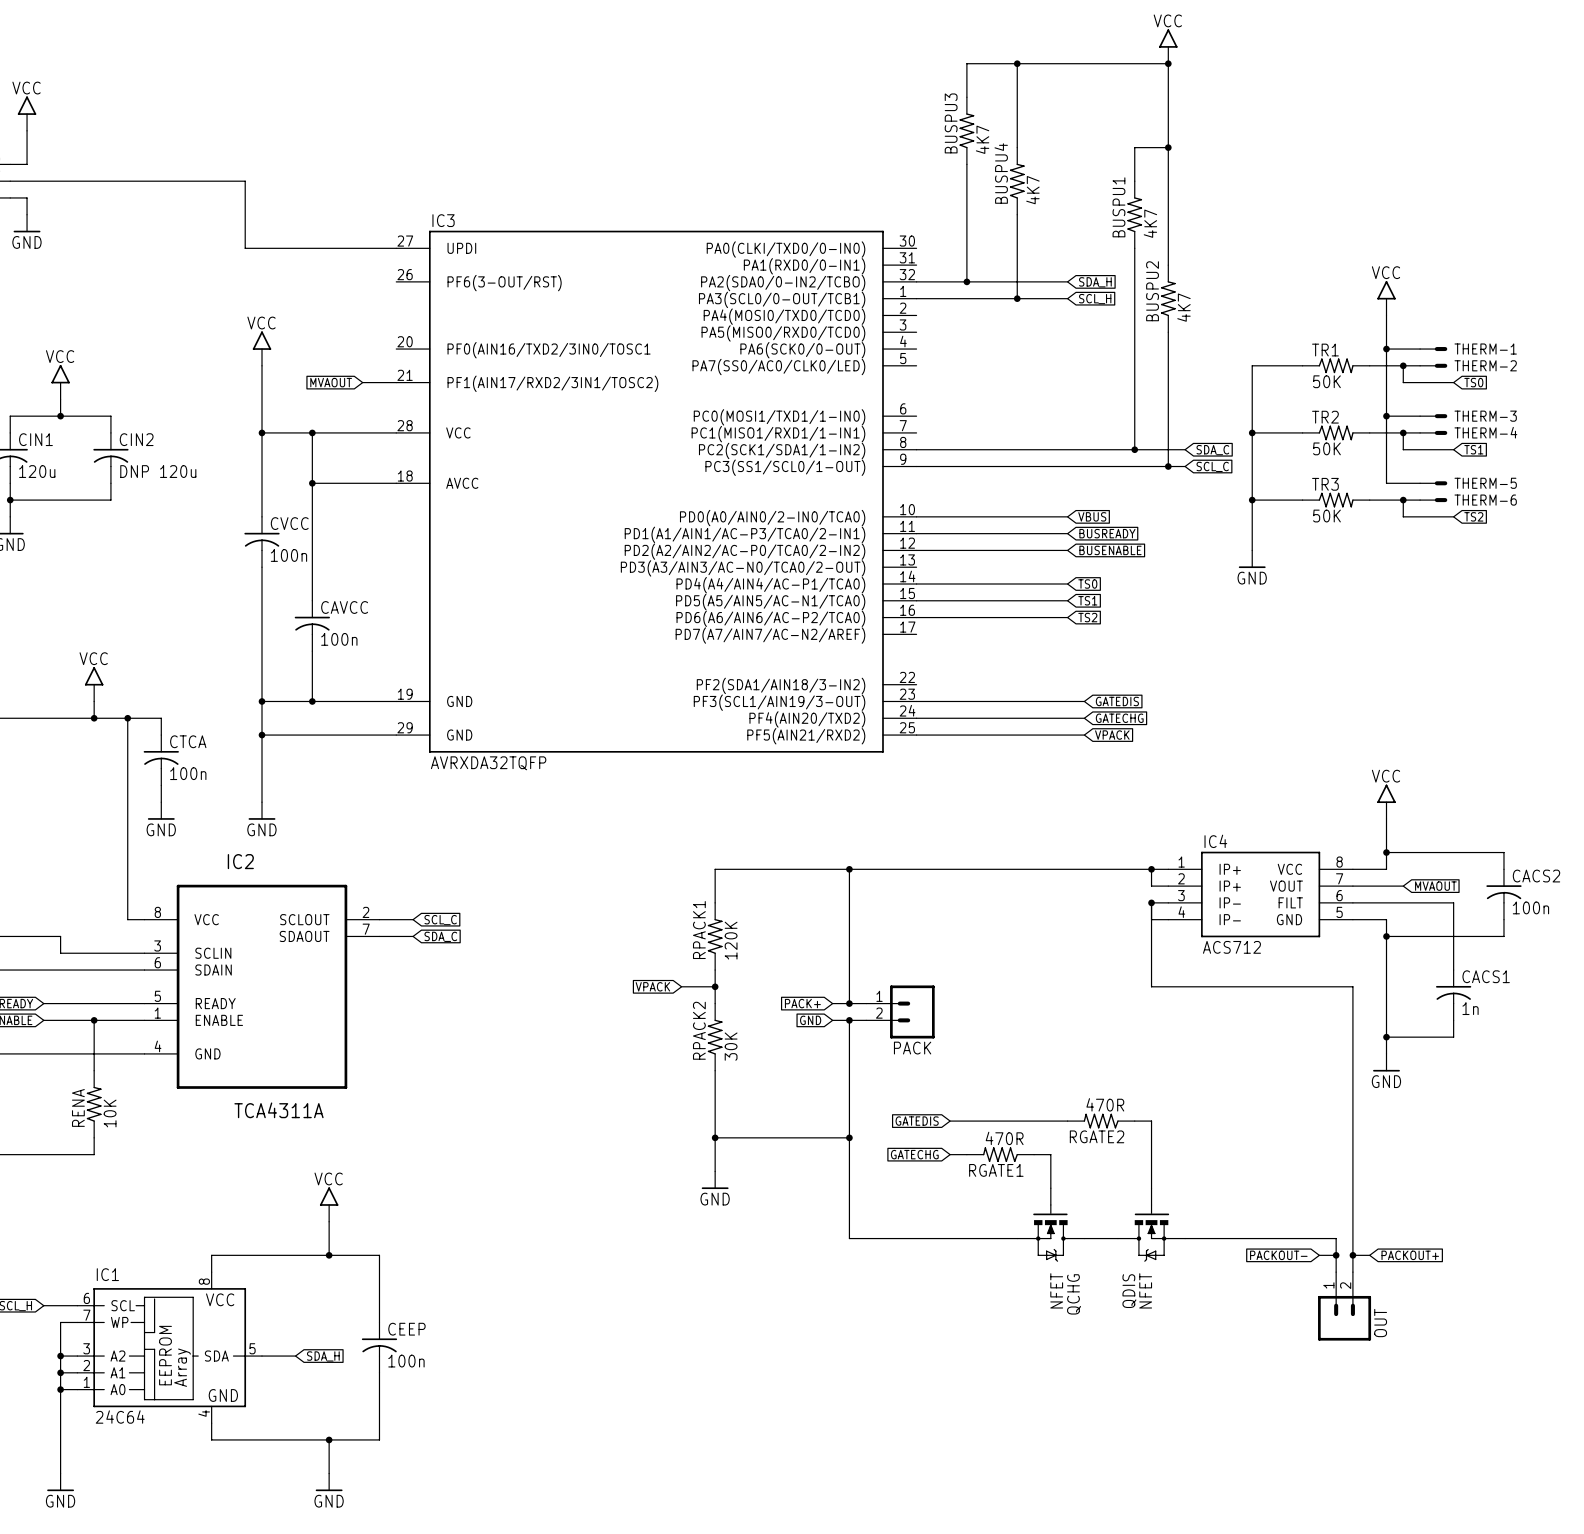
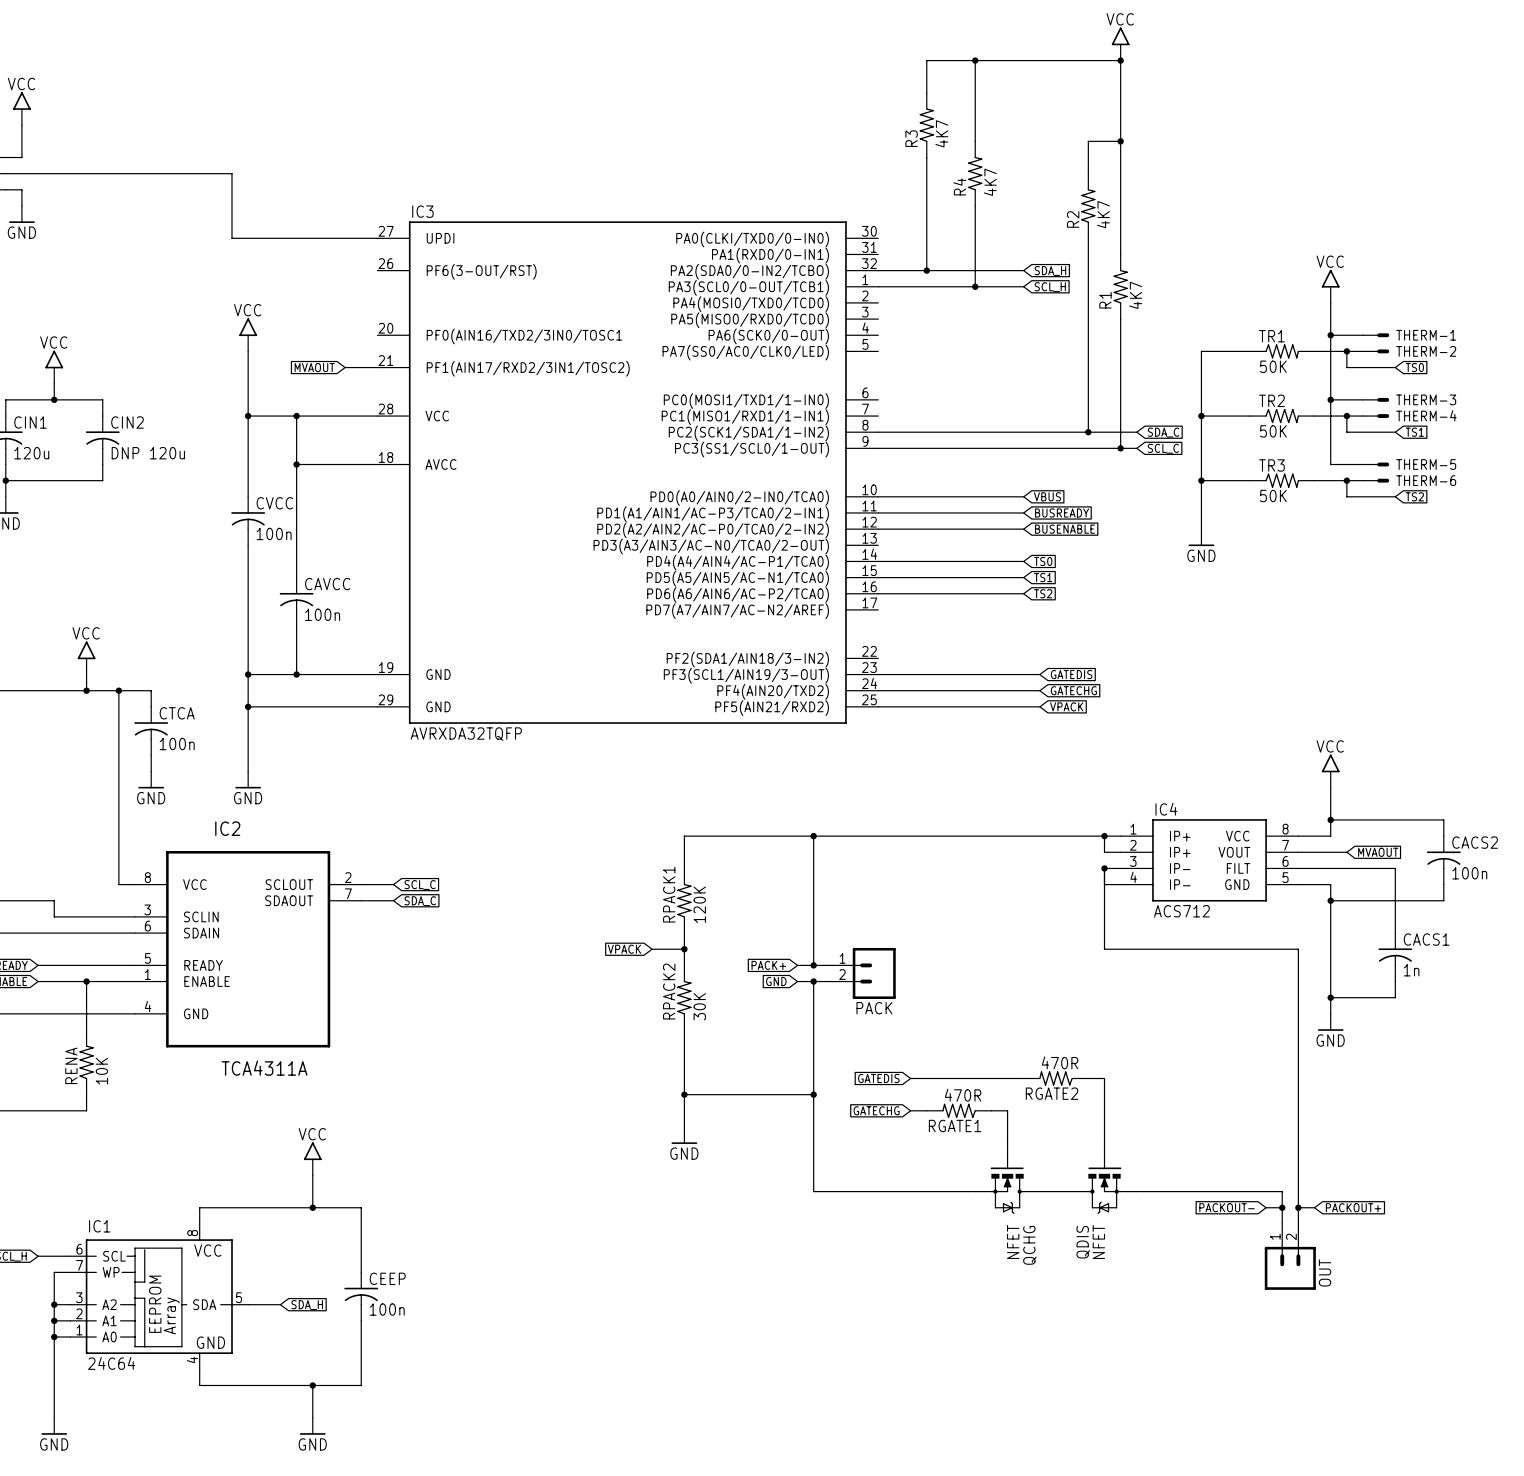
BUSPU3 name: BUSPU3 (951, 123) -> R3 (911, 138)
BUSPU4 name: BUSPU4 (1001, 173) -> R4 (959, 186)
BUSPU1 name: BUSPU1 (1118, 207) -> R2 (1073, 219)
BUSPU2 name: BUSPU2 (1152, 291) -> R1 (1105, 300)

